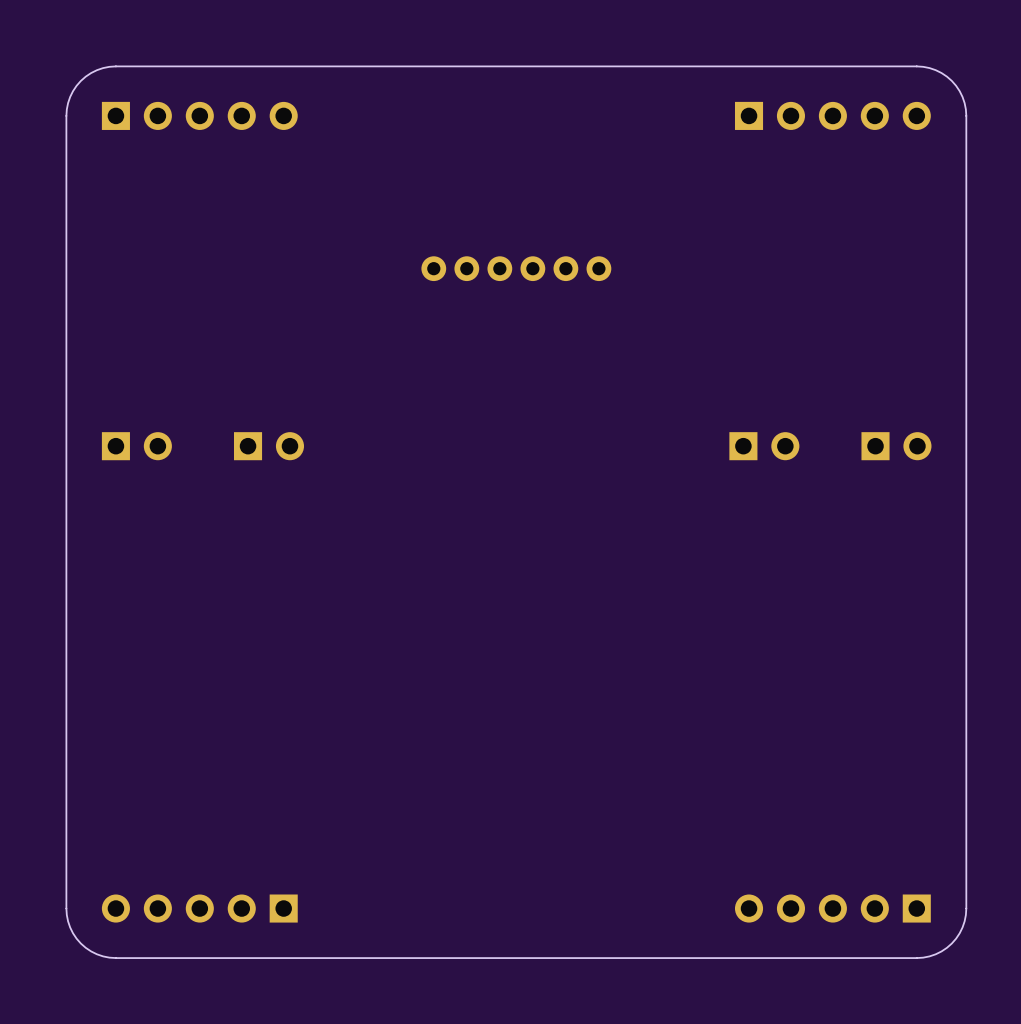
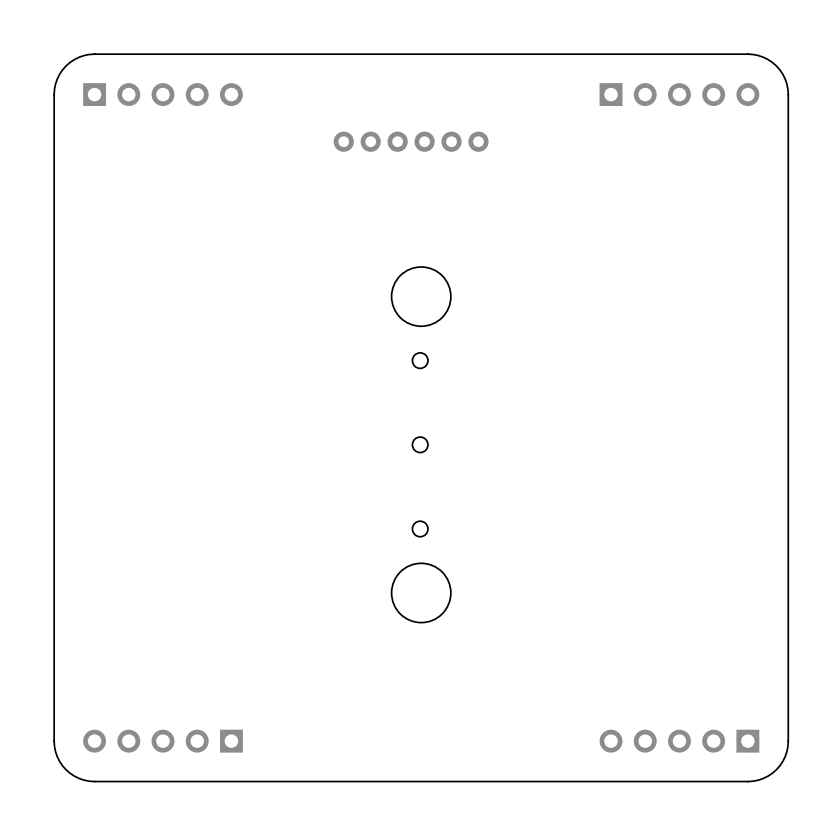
part position: (516, 268) -> (411, 141)
round board edge: none -> [390, 266, 452, 327]
round board edge: none -> [411, 352, 429, 370]
part: (136, 446) -> none
part: (269, 446) -> none
part: (764, 446) -> none
part: (896, 446) -> none
round board edge: none -> [411, 436, 429, 454]
round board edge: none -> [411, 520, 429, 538]
round board edge: none -> [390, 562, 452, 624]

